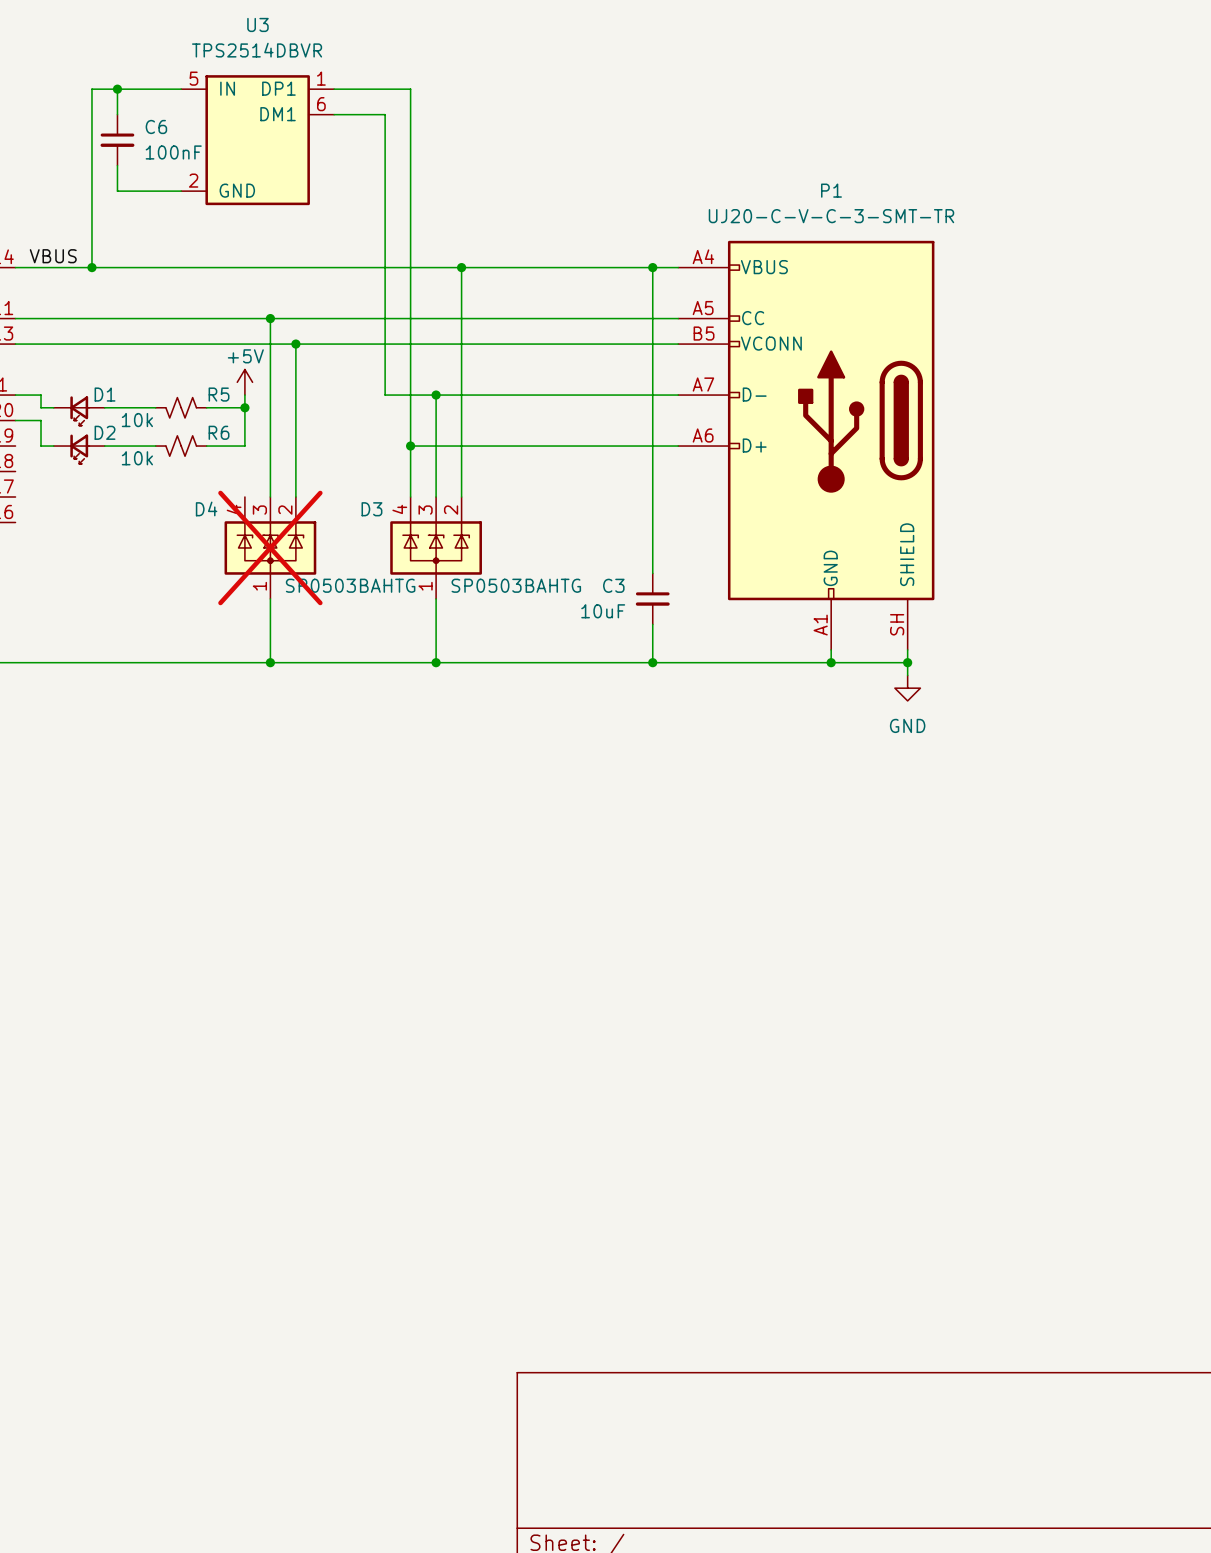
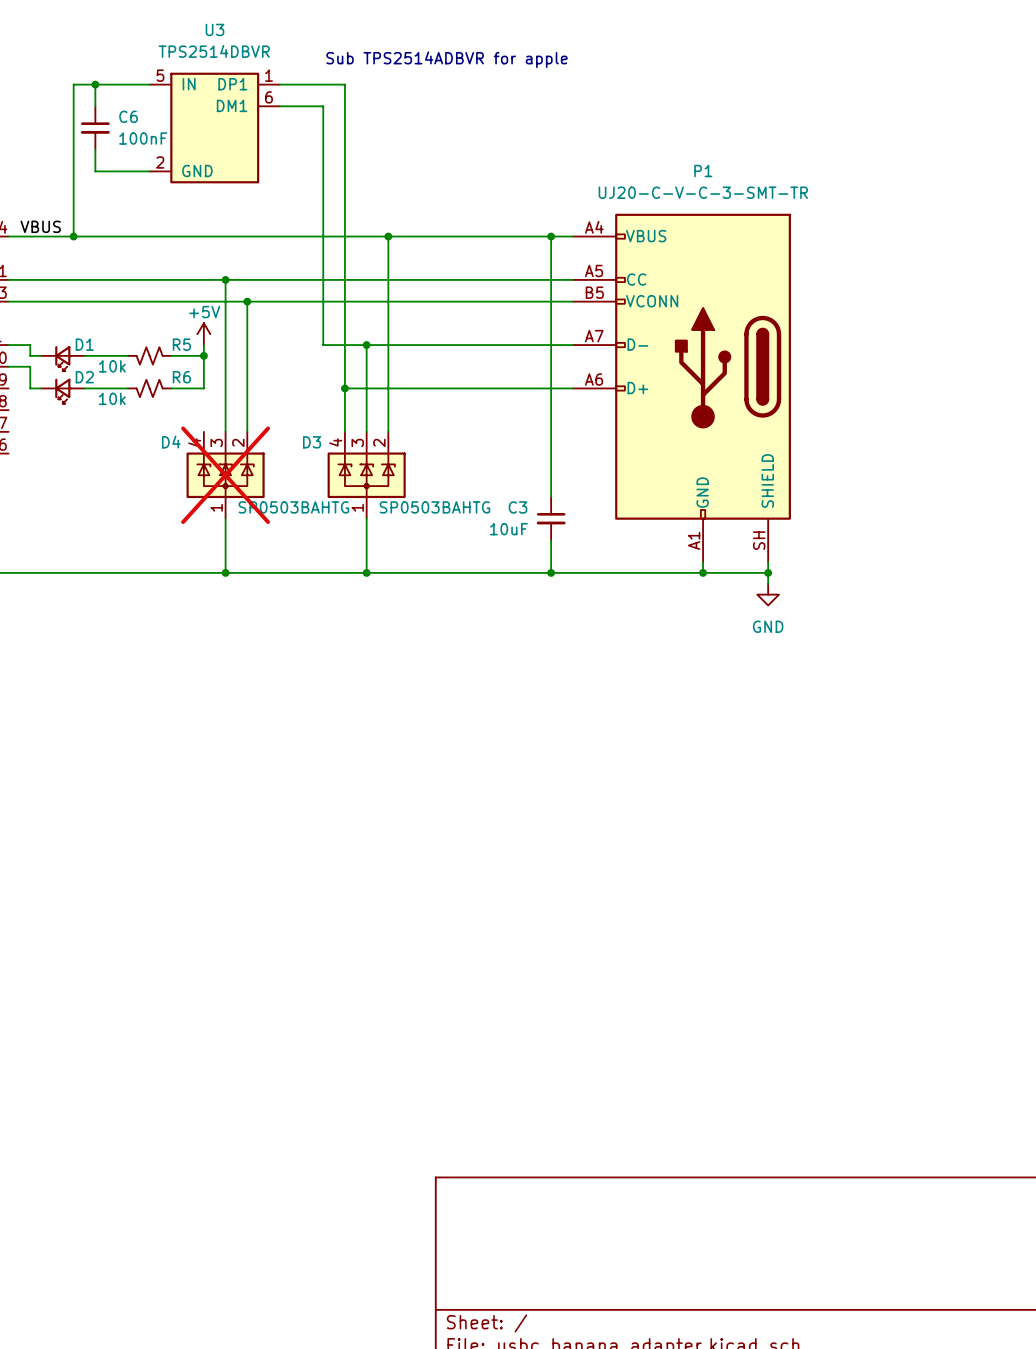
text: none -> Sub TPS2514ADBVR for apple (446, 59)

